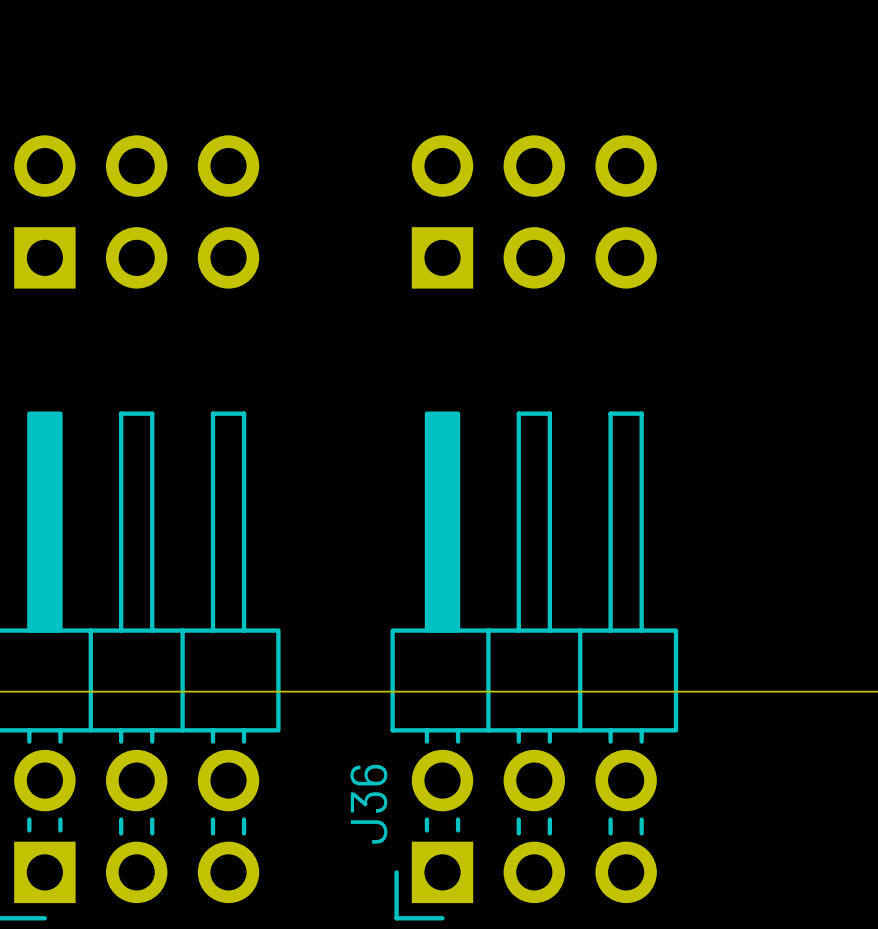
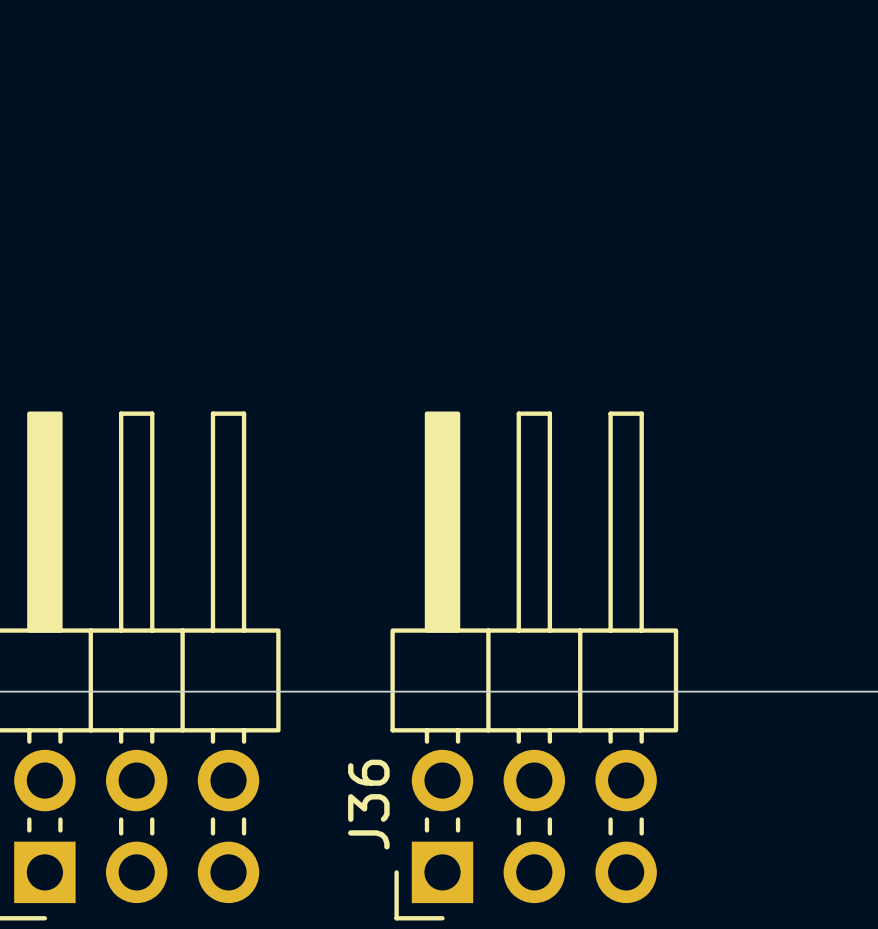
part: (136, 211) -> none
part: (534, 211) -> none

